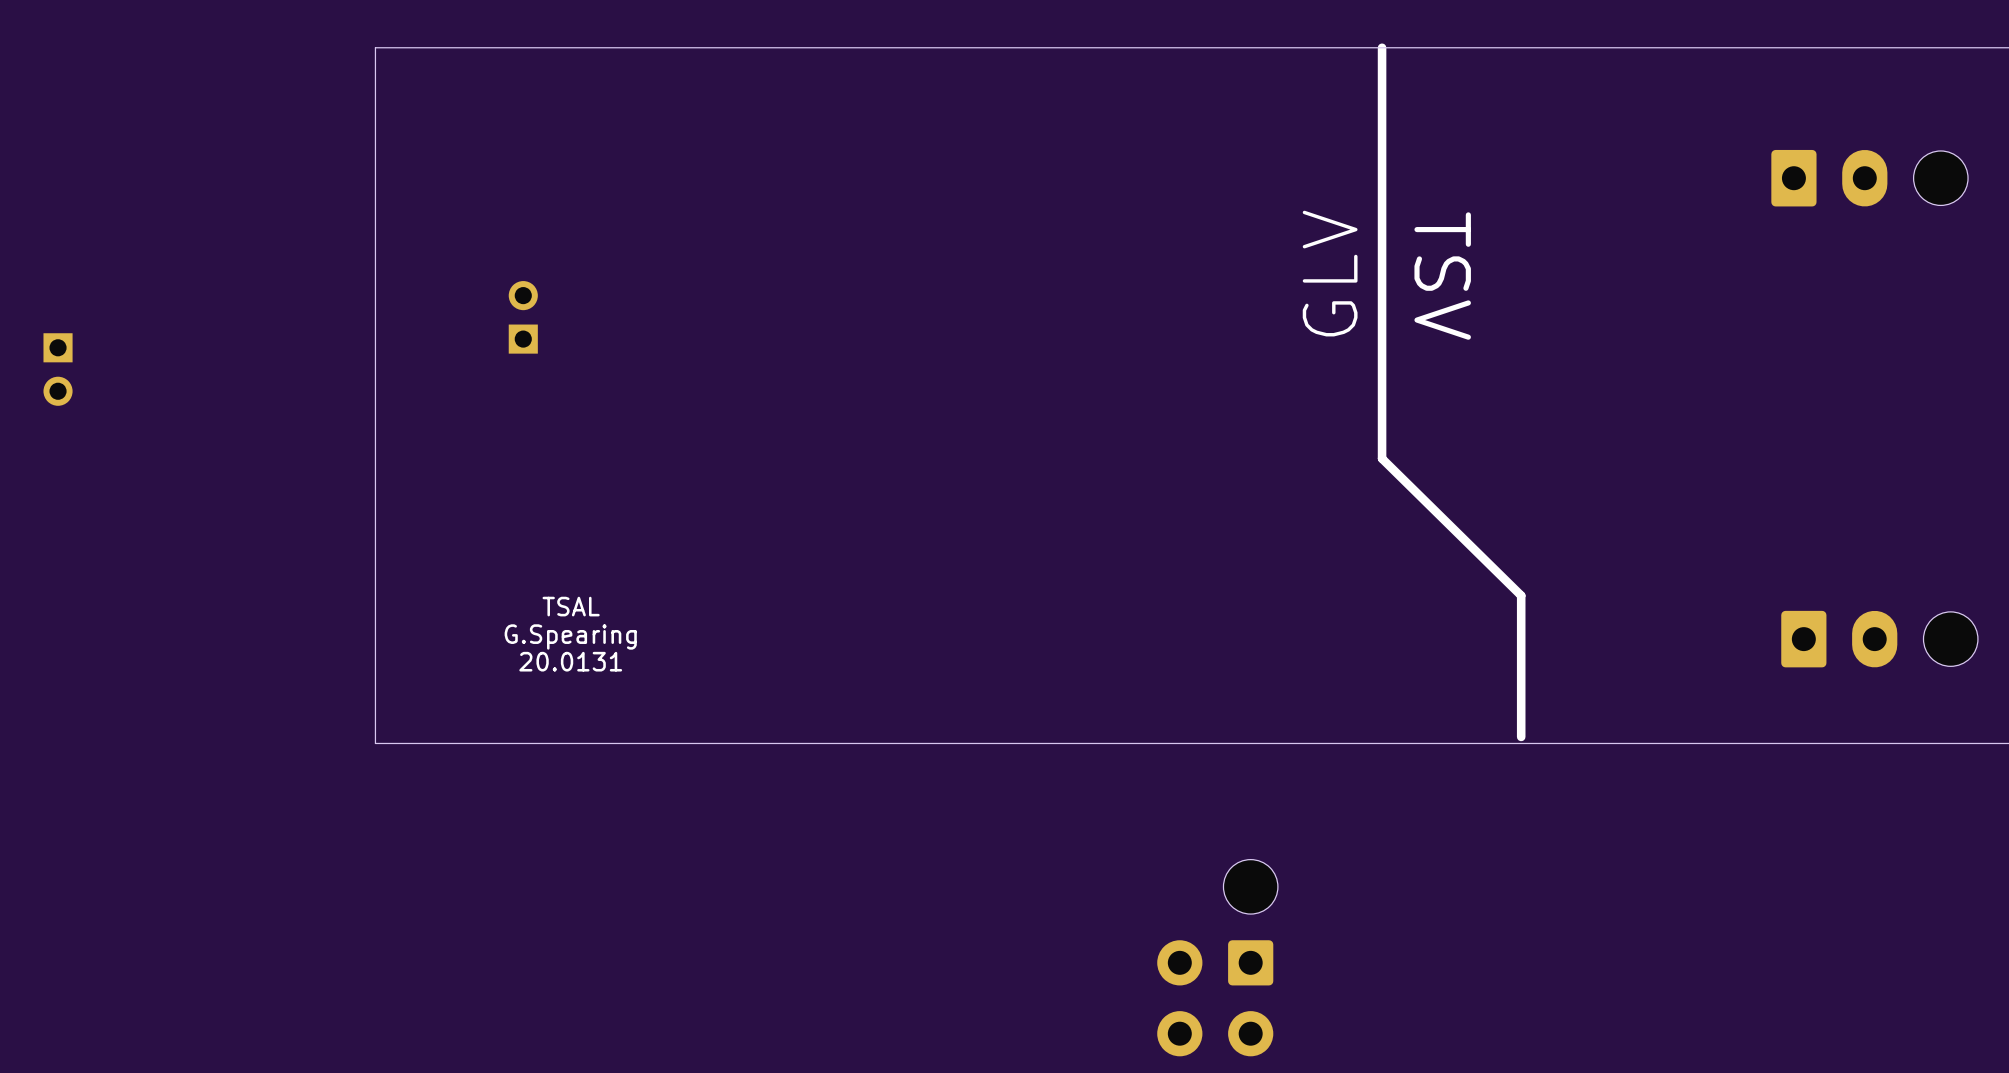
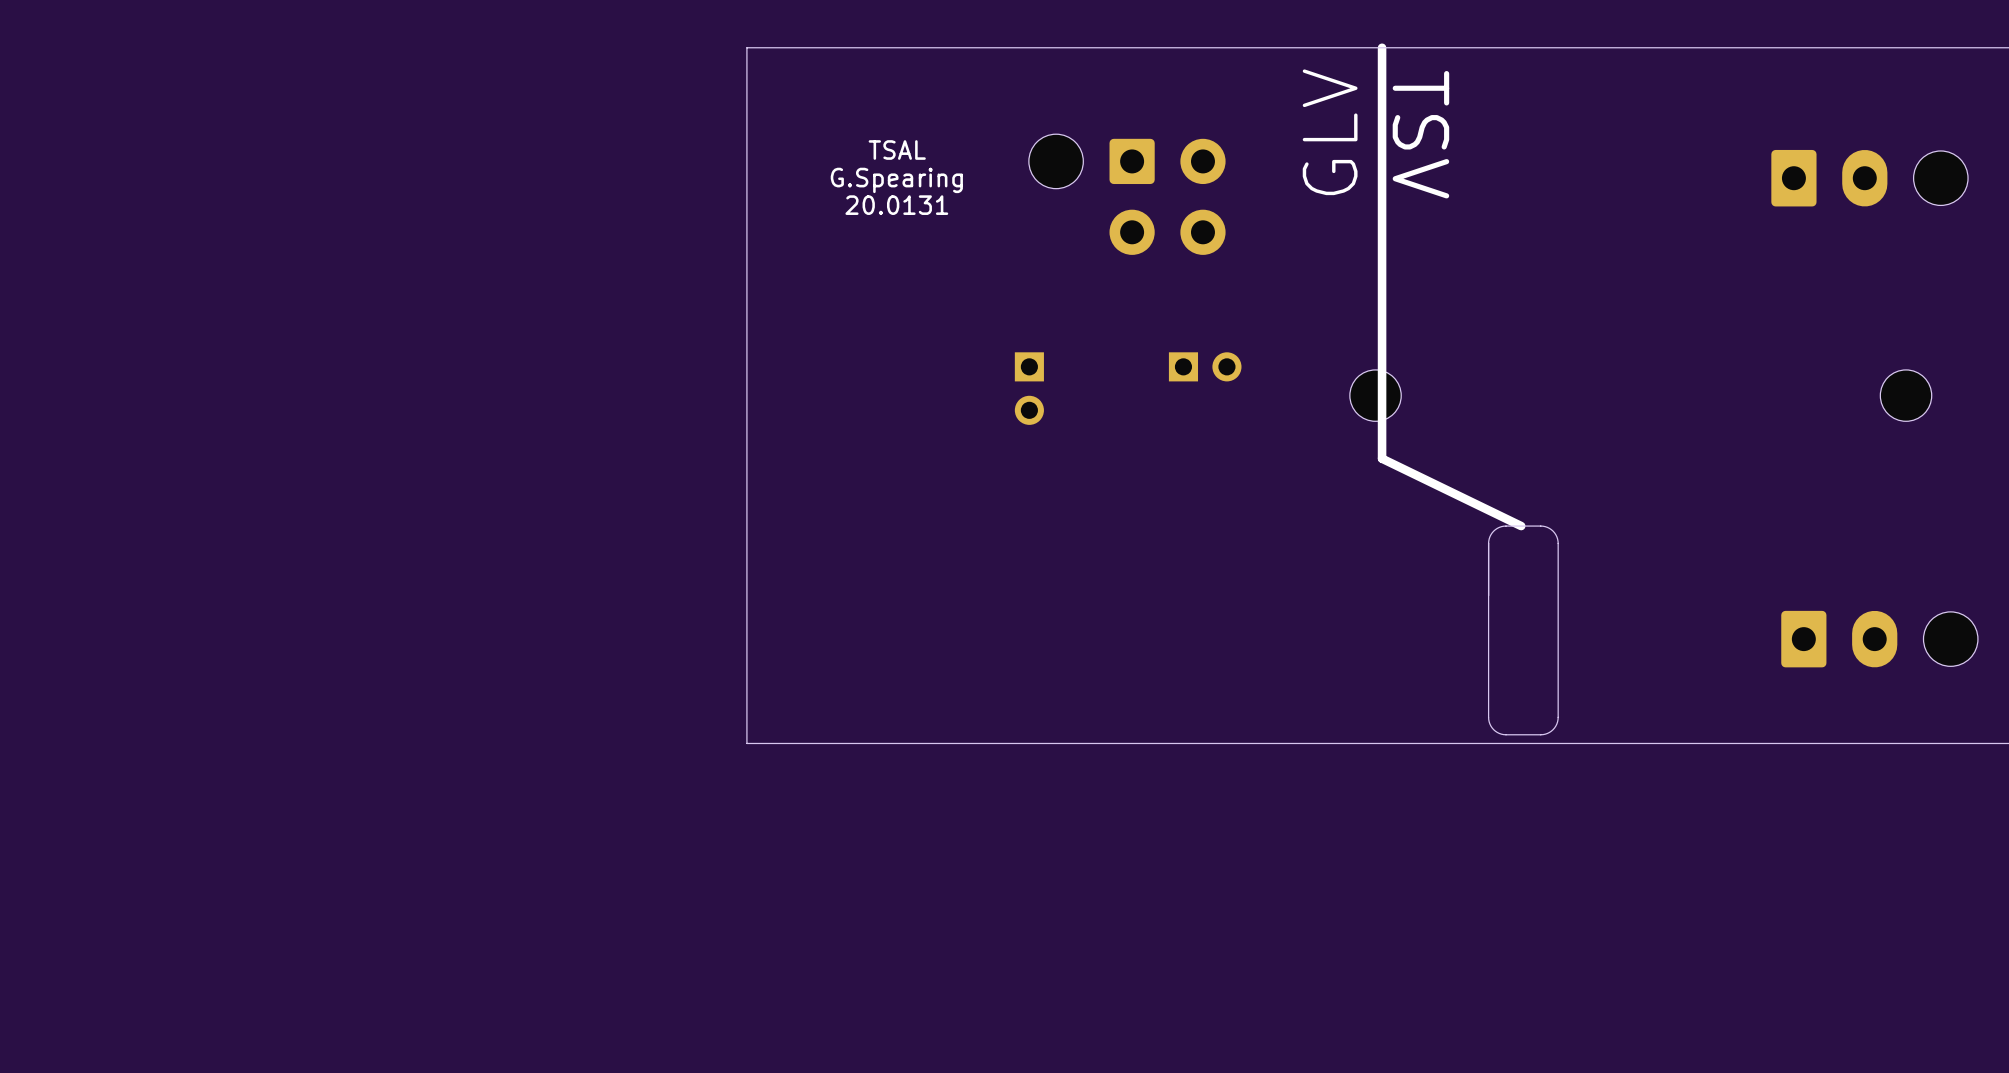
board edge: (746, 47) (375, 47) (375, 743) (746, 743) -> (746, 47) (746, 743)
text: none -> TSAL (897, 150)
text: none -> G.Spearing (896, 180)
part: none -> (1127, 194)
text: none -> 20.0131 (896, 205)
text position: GLV (1330, 273) -> GLV (1330, 132)
text position: TSV (1442, 276) -> TSV (1420, 134)
part: (523, 317) -> none
part: none -> (1205, 366)
part: (58, 369) -> none
part: none -> (1029, 388)
part: none -> (1375, 395)
part: none -> (1906, 395)
line: (1382, 458) (1521, 595) (1521, 736) -> (1382, 458) (1521, 526)
board edge: none -> (1540, 526) (1501, 526) (1492, 532) (1488, 541) (1488, 719) (1493, 729) (1503, 734) (1545, 734) (1554, 727) (1558, 719) (1558, 541) (1553, 531) (1540, 526)
text: TSAL (571, 606) -> none
text: G.Spearing (570, 636) -> none
text: 20.0131 (570, 661) -> none
part: (1217, 957) -> none

